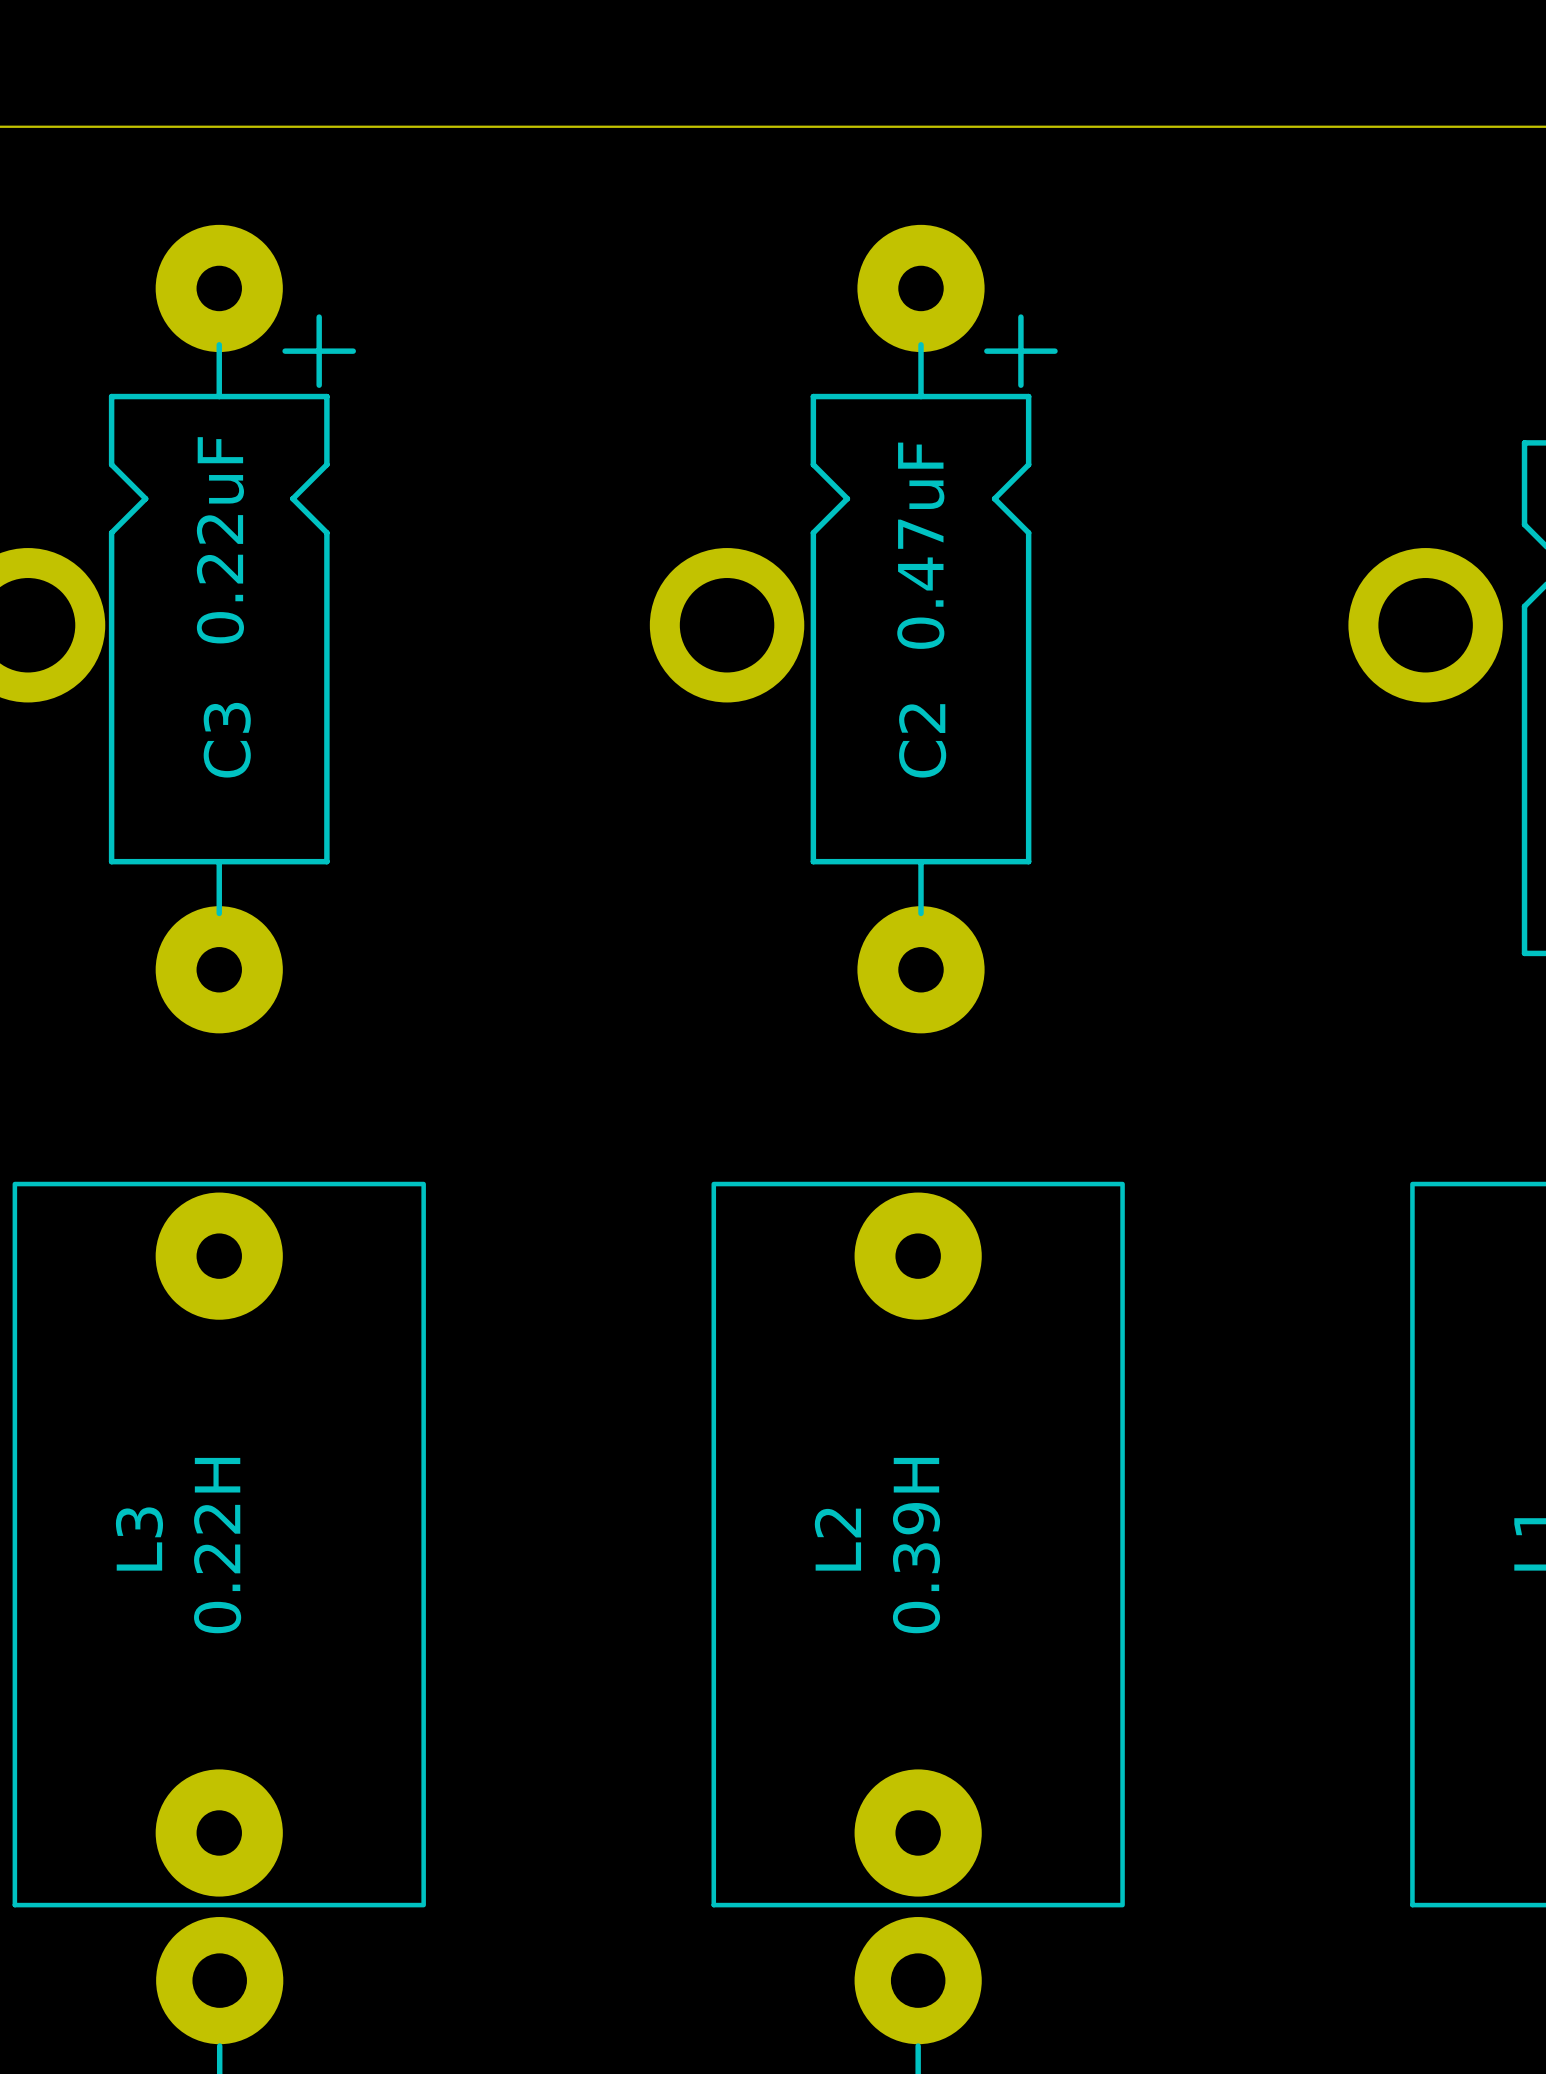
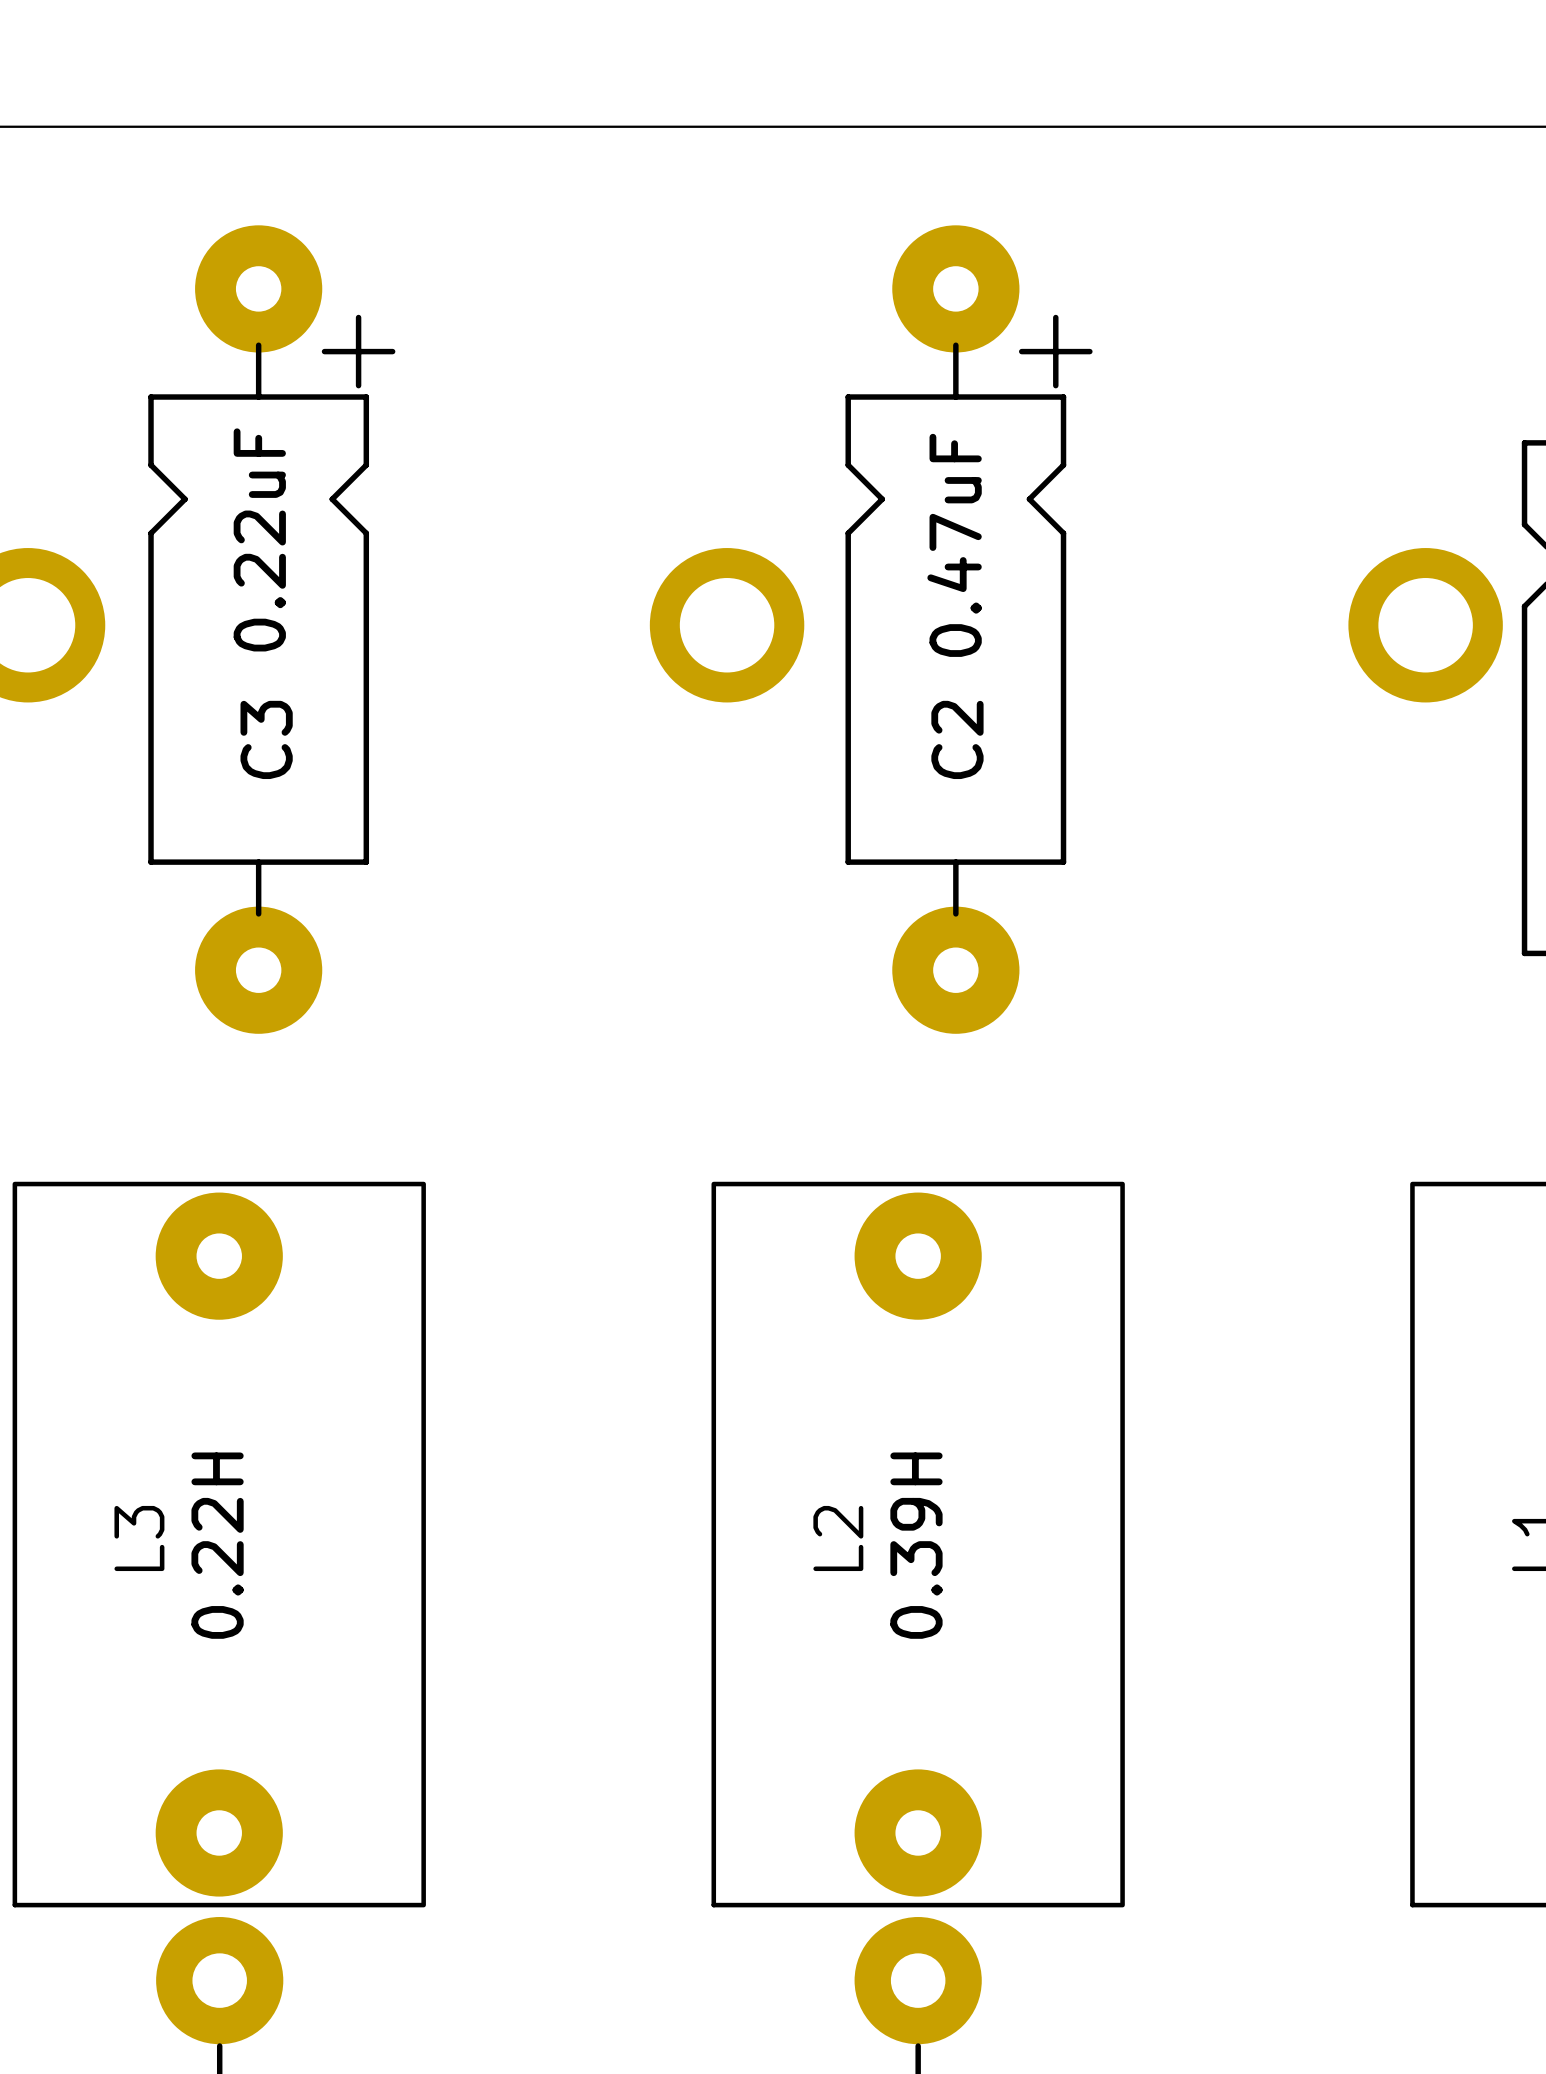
C3 position: (232, 629) -> (271, 629)
C2 position: (934, 629) -> (969, 629)

